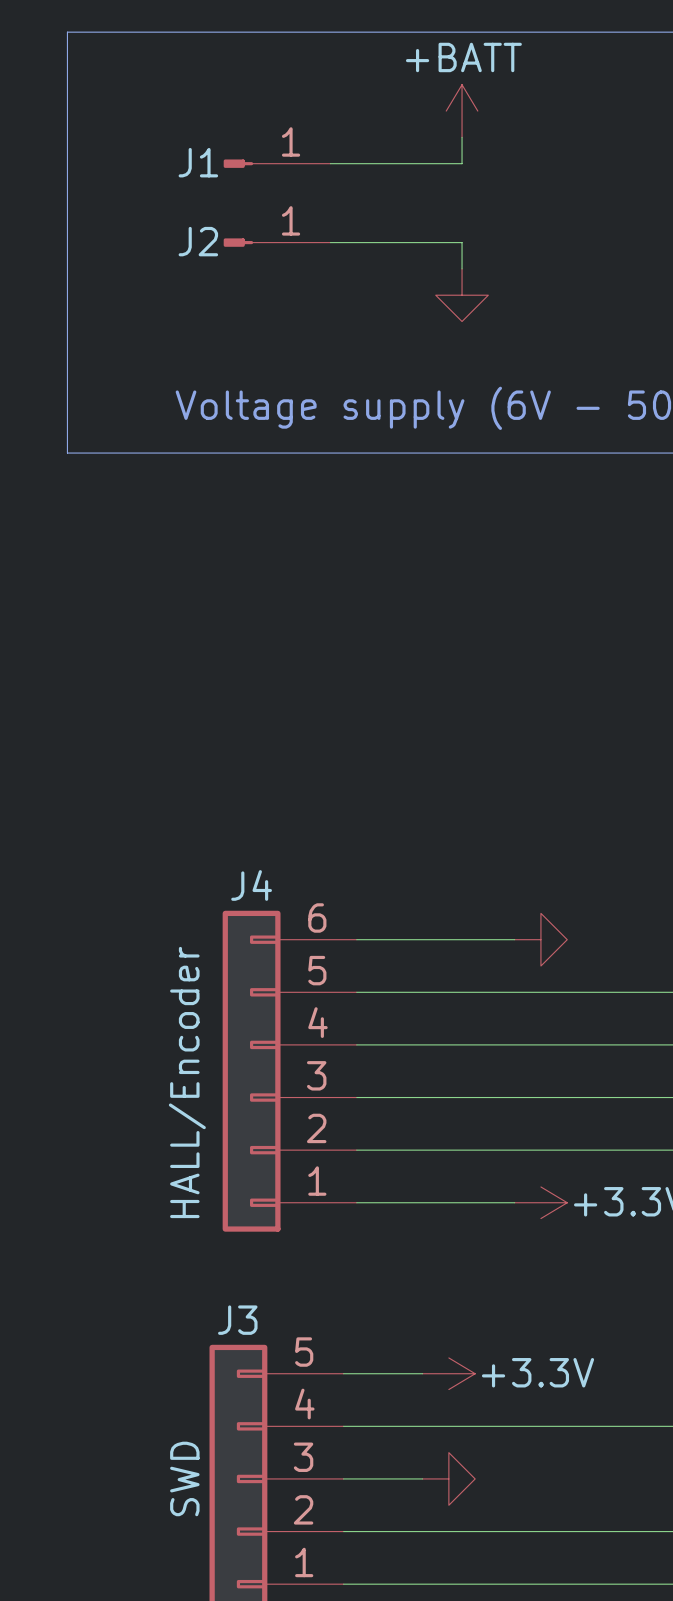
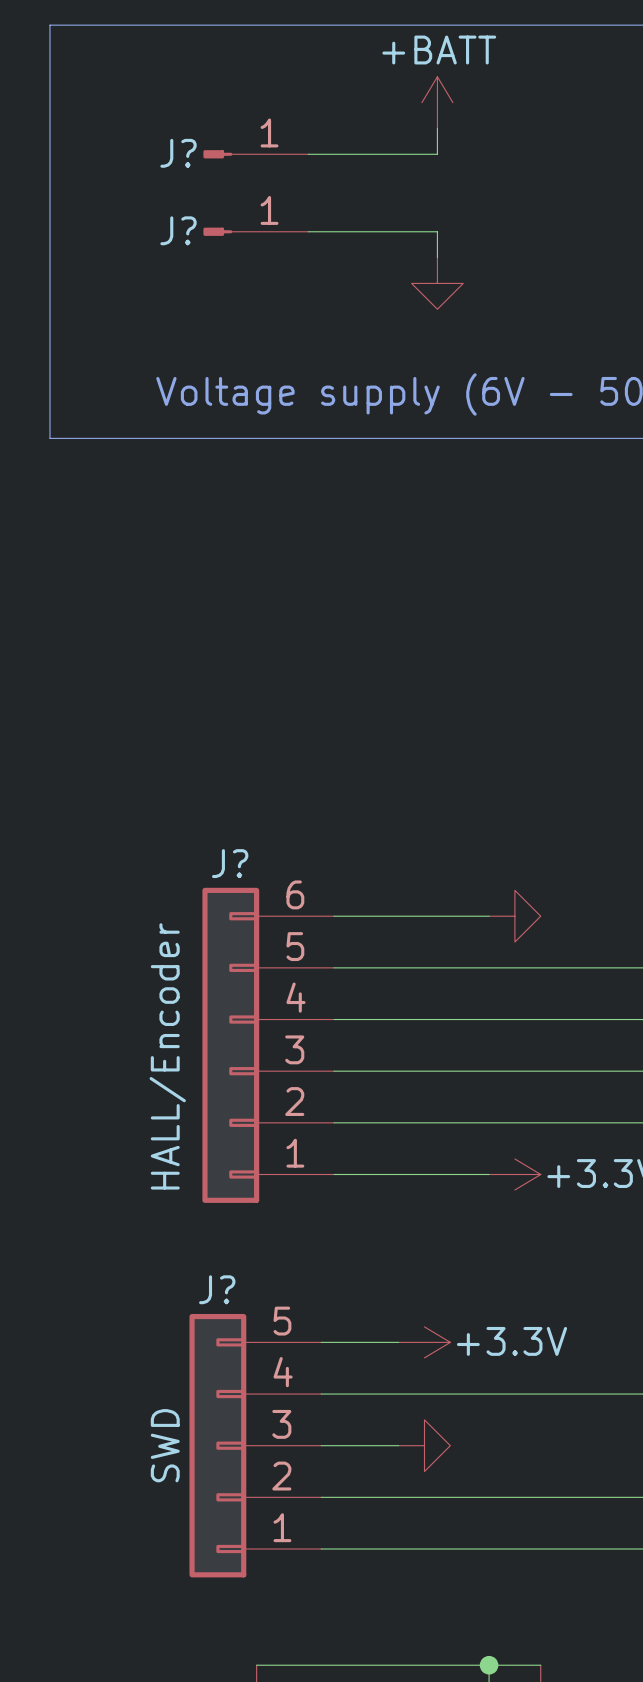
J1 name: J1 (198, 162) -> J? (178, 153)
J2 name: J2 (198, 241) -> J? (178, 230)
J4 name: J4 (251, 885) -> J? (230, 863)
J3 name: J3 (237, 1320) -> J? (217, 1289)

